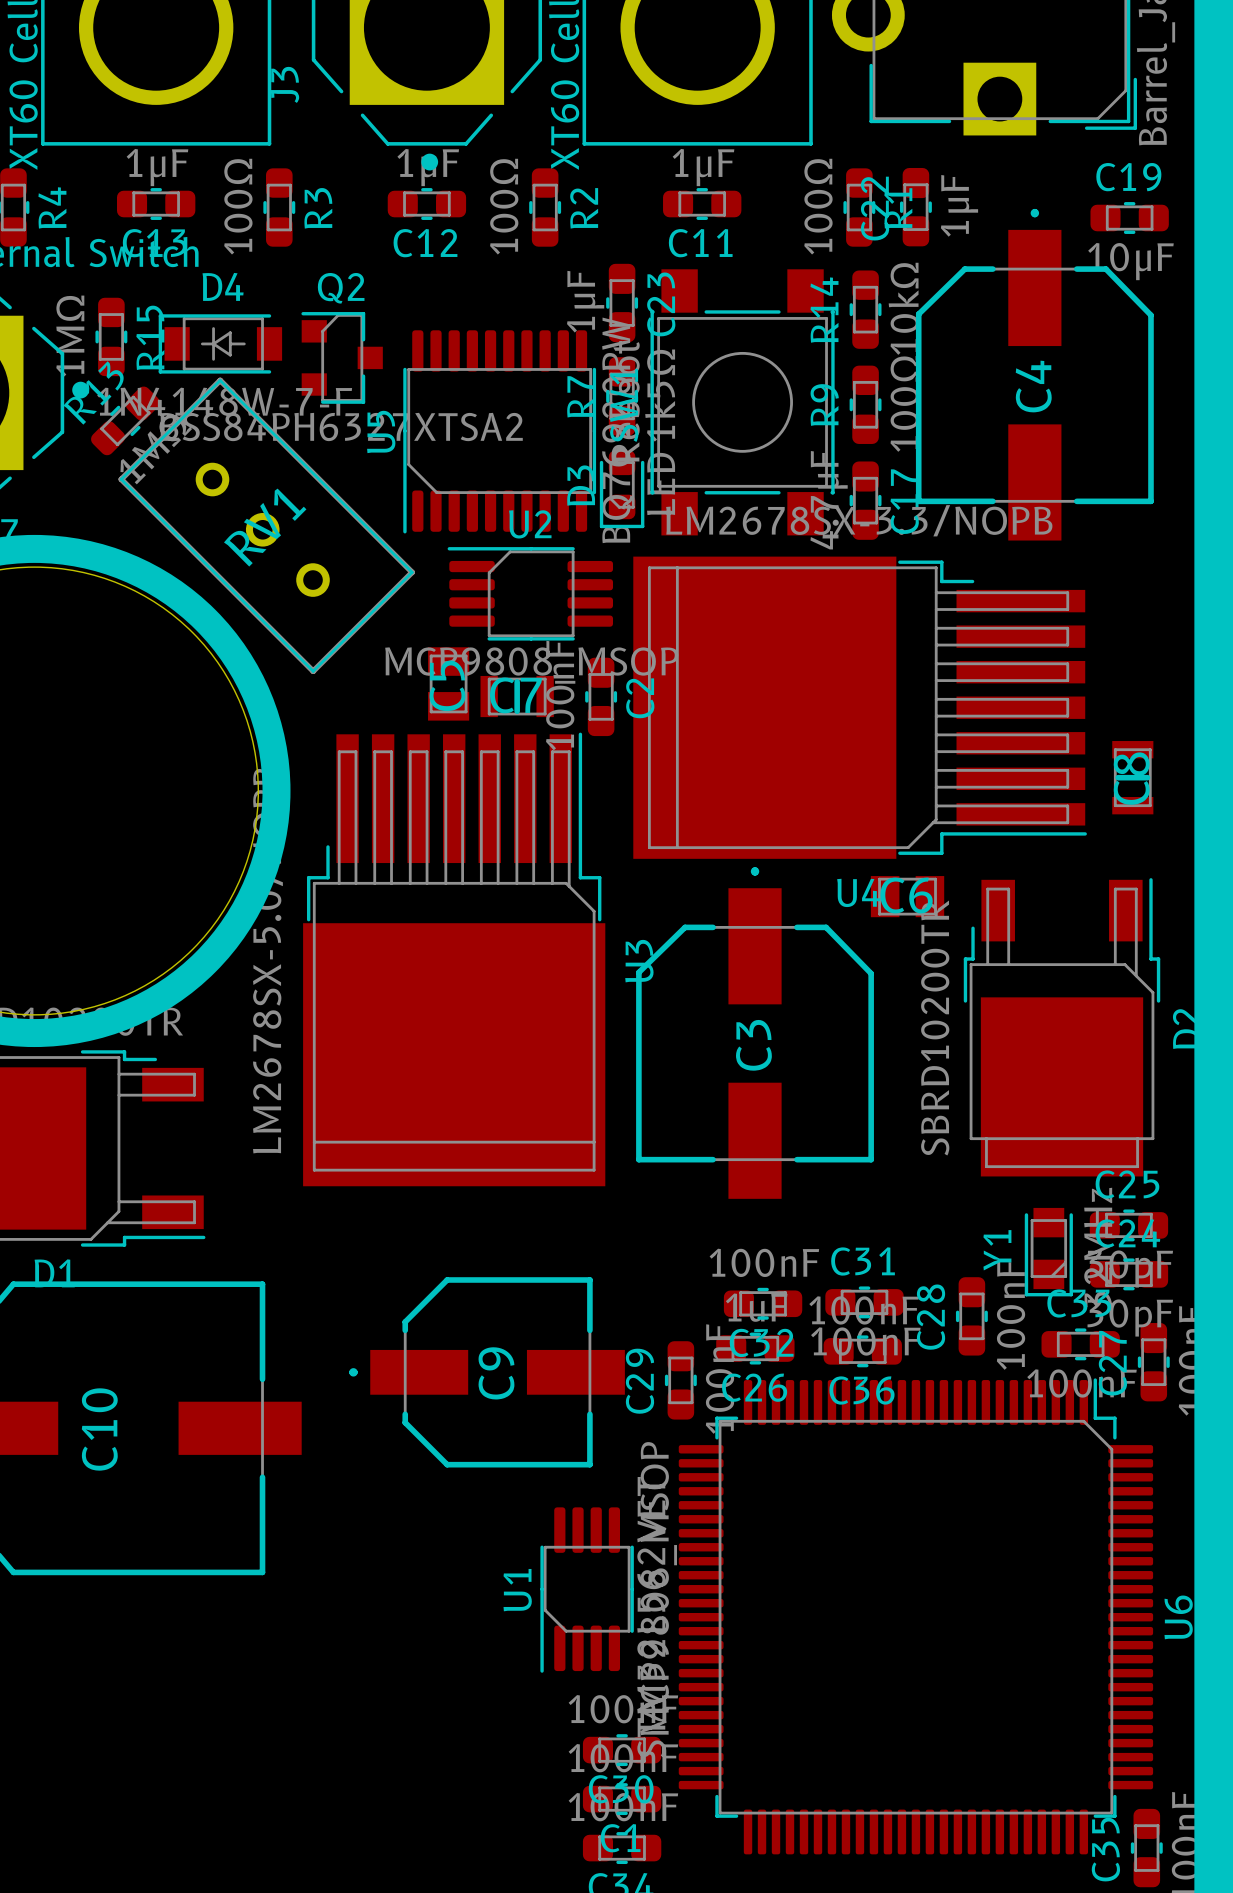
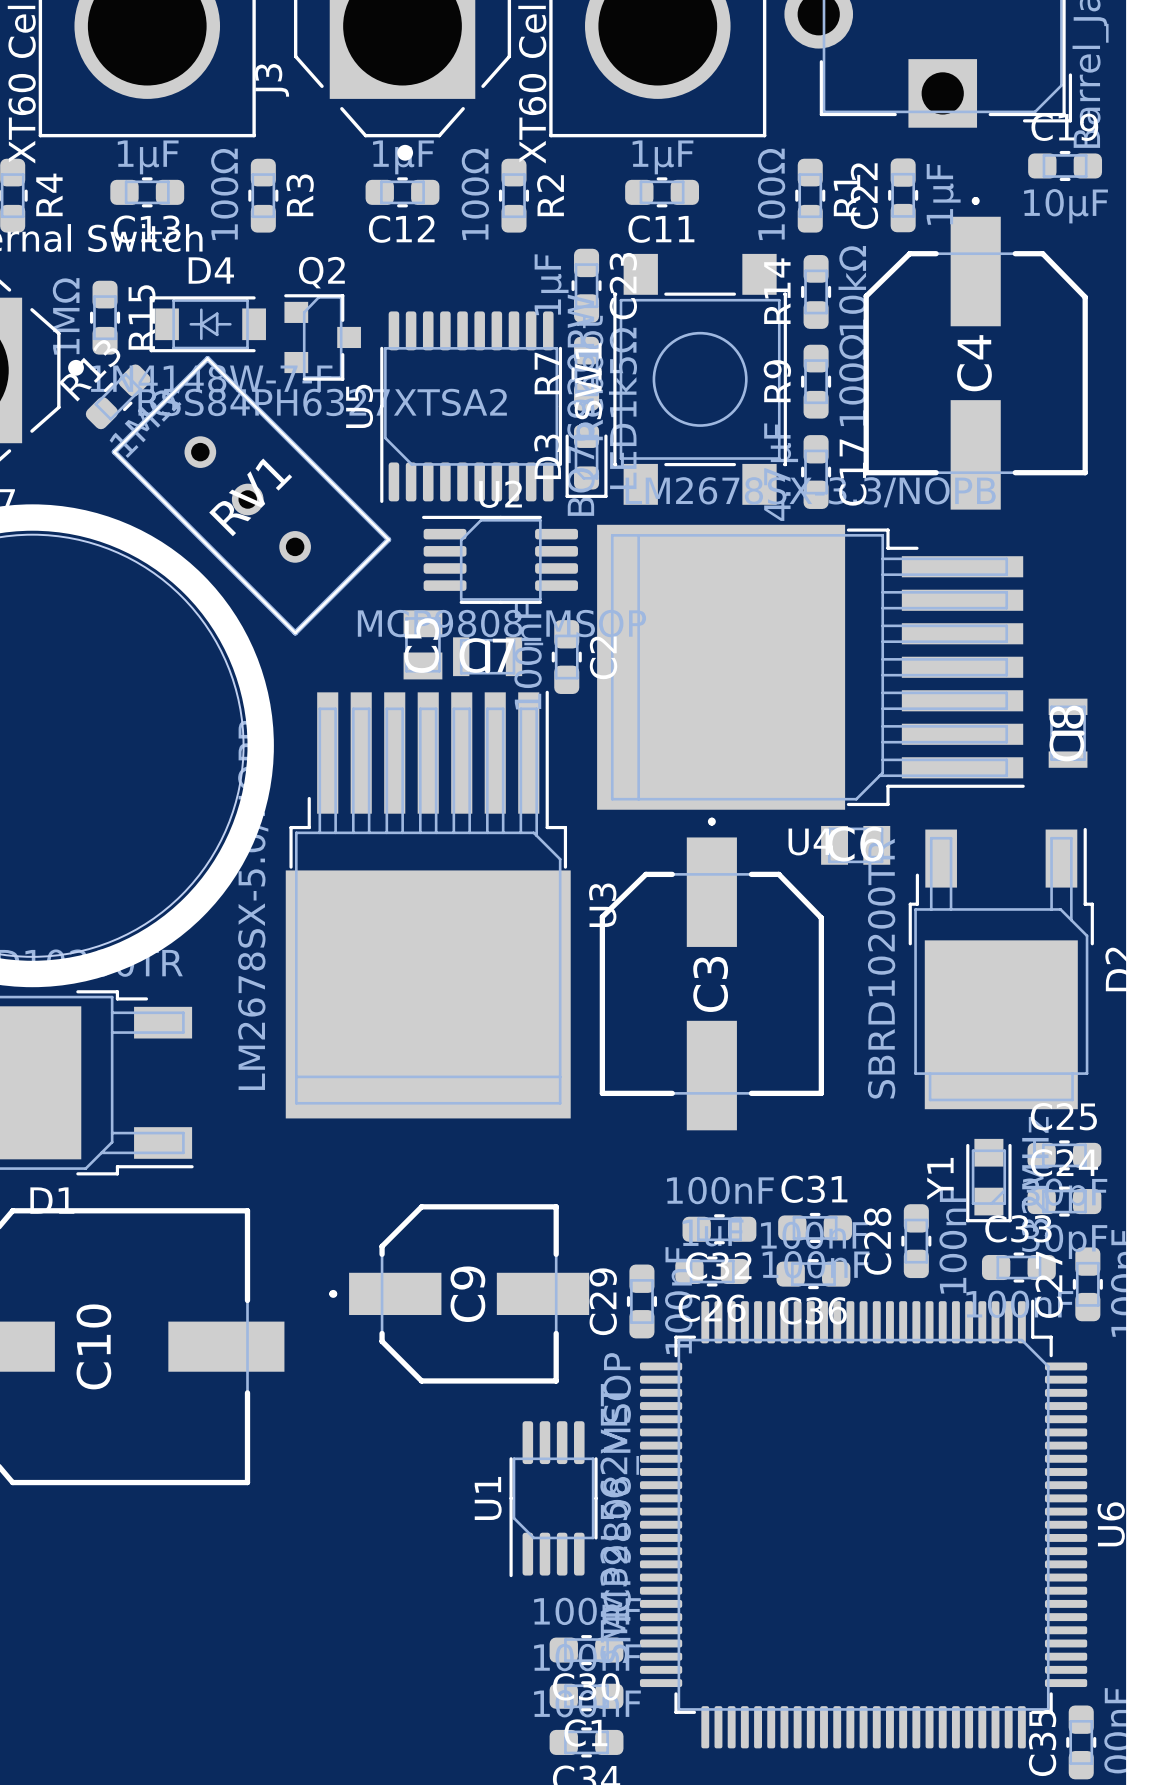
C22 position: (915, 207) -> (903, 195)
C19 position: (1129, 218) -> (1065, 165)

